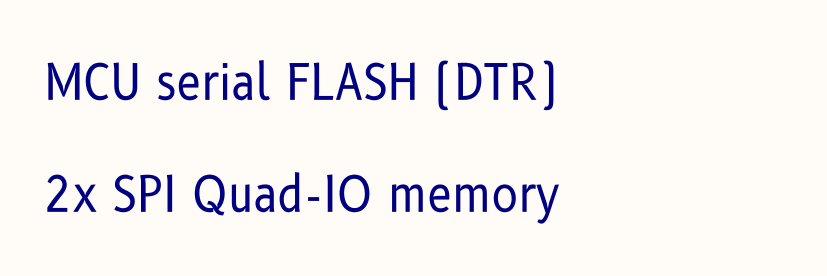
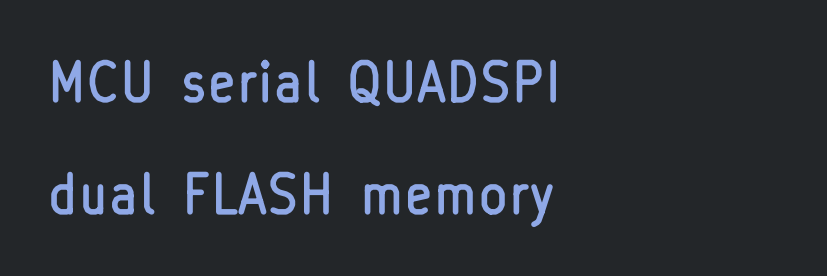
text: MCU serial FLASH (DTR) (300, 85) -> MCU serial QUADSPI (304, 82)
text: 2x SPI Quad-IO memory (303, 197) -> dual FLASH memory (302, 199)

